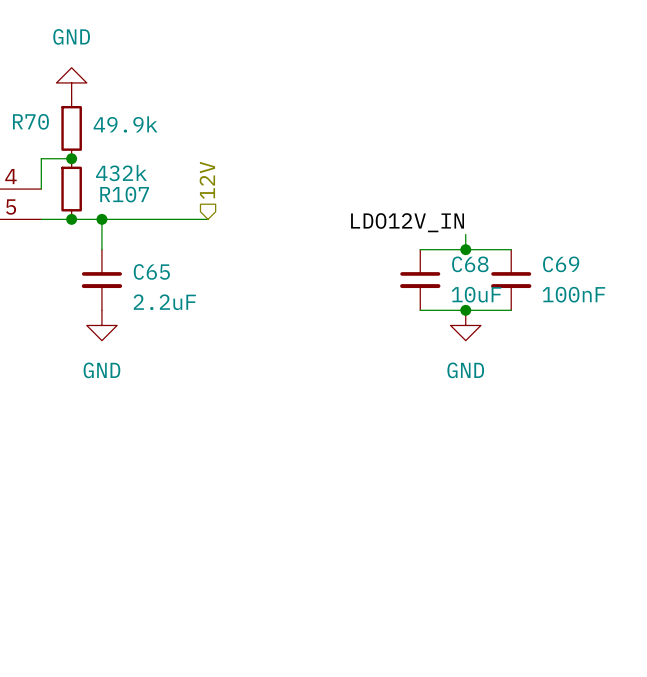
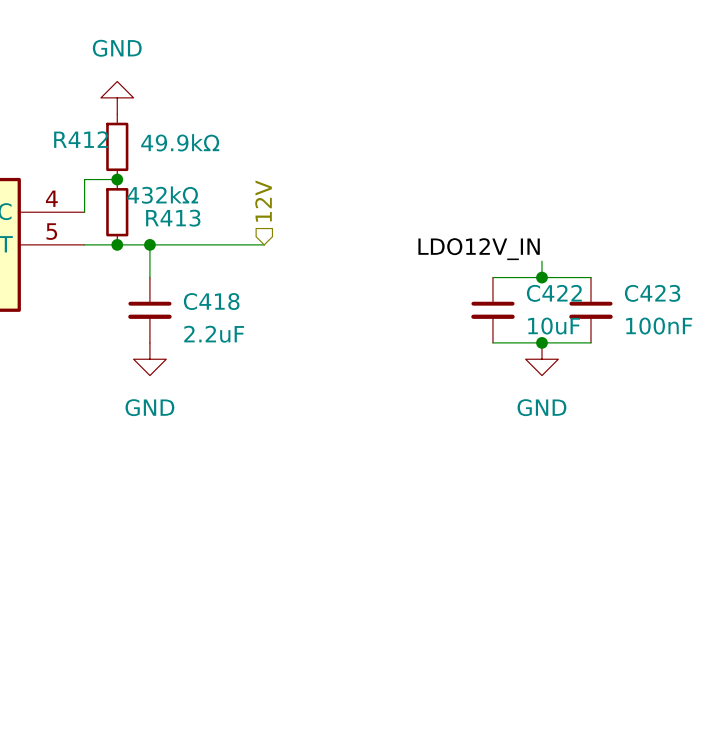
R70 name: R70 (30, 121) -> R412 (81, 139)
R70 value: 49.9k (125, 124) -> 49.9kΩ (180, 142)
R107 value: 432k (121, 173) -> 432kΩ (162, 195)
R107 name: R107 (124, 194) -> R413 (173, 218)
C68 name: C68 (470, 264) -> C422 (554, 293)
C69 name: C69 (561, 264) -> C423 (652, 293)
C65 name: C65 (151, 271) -> C418 (211, 301)

